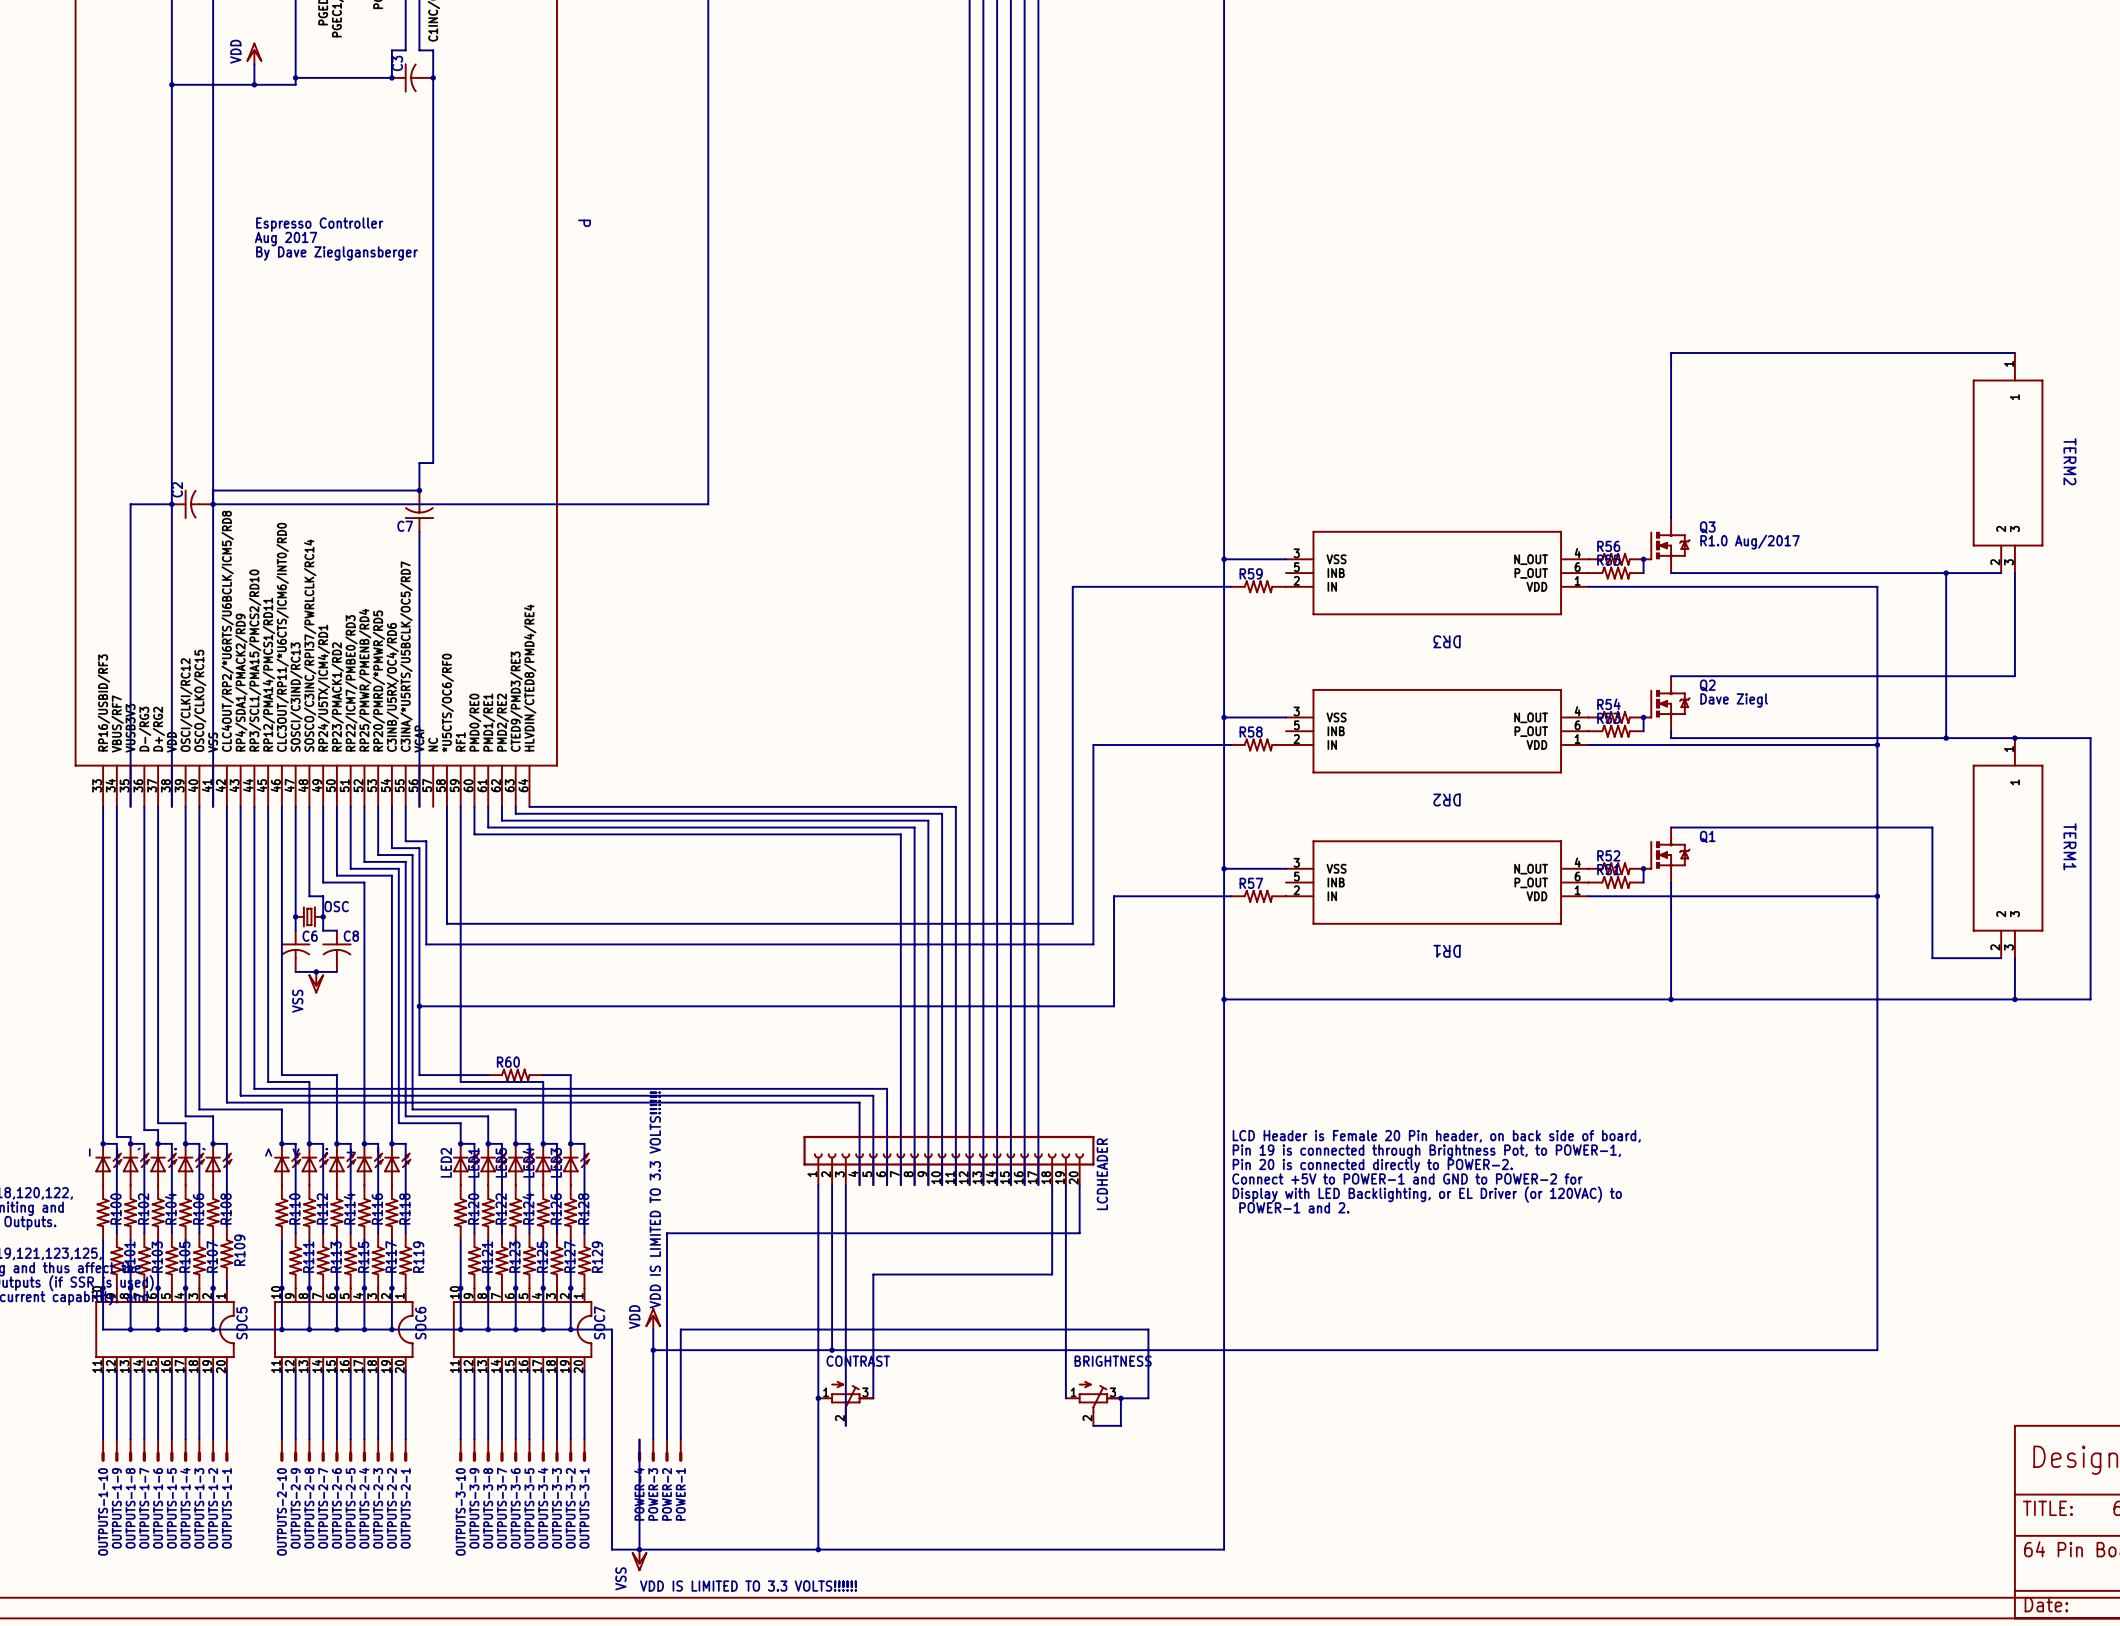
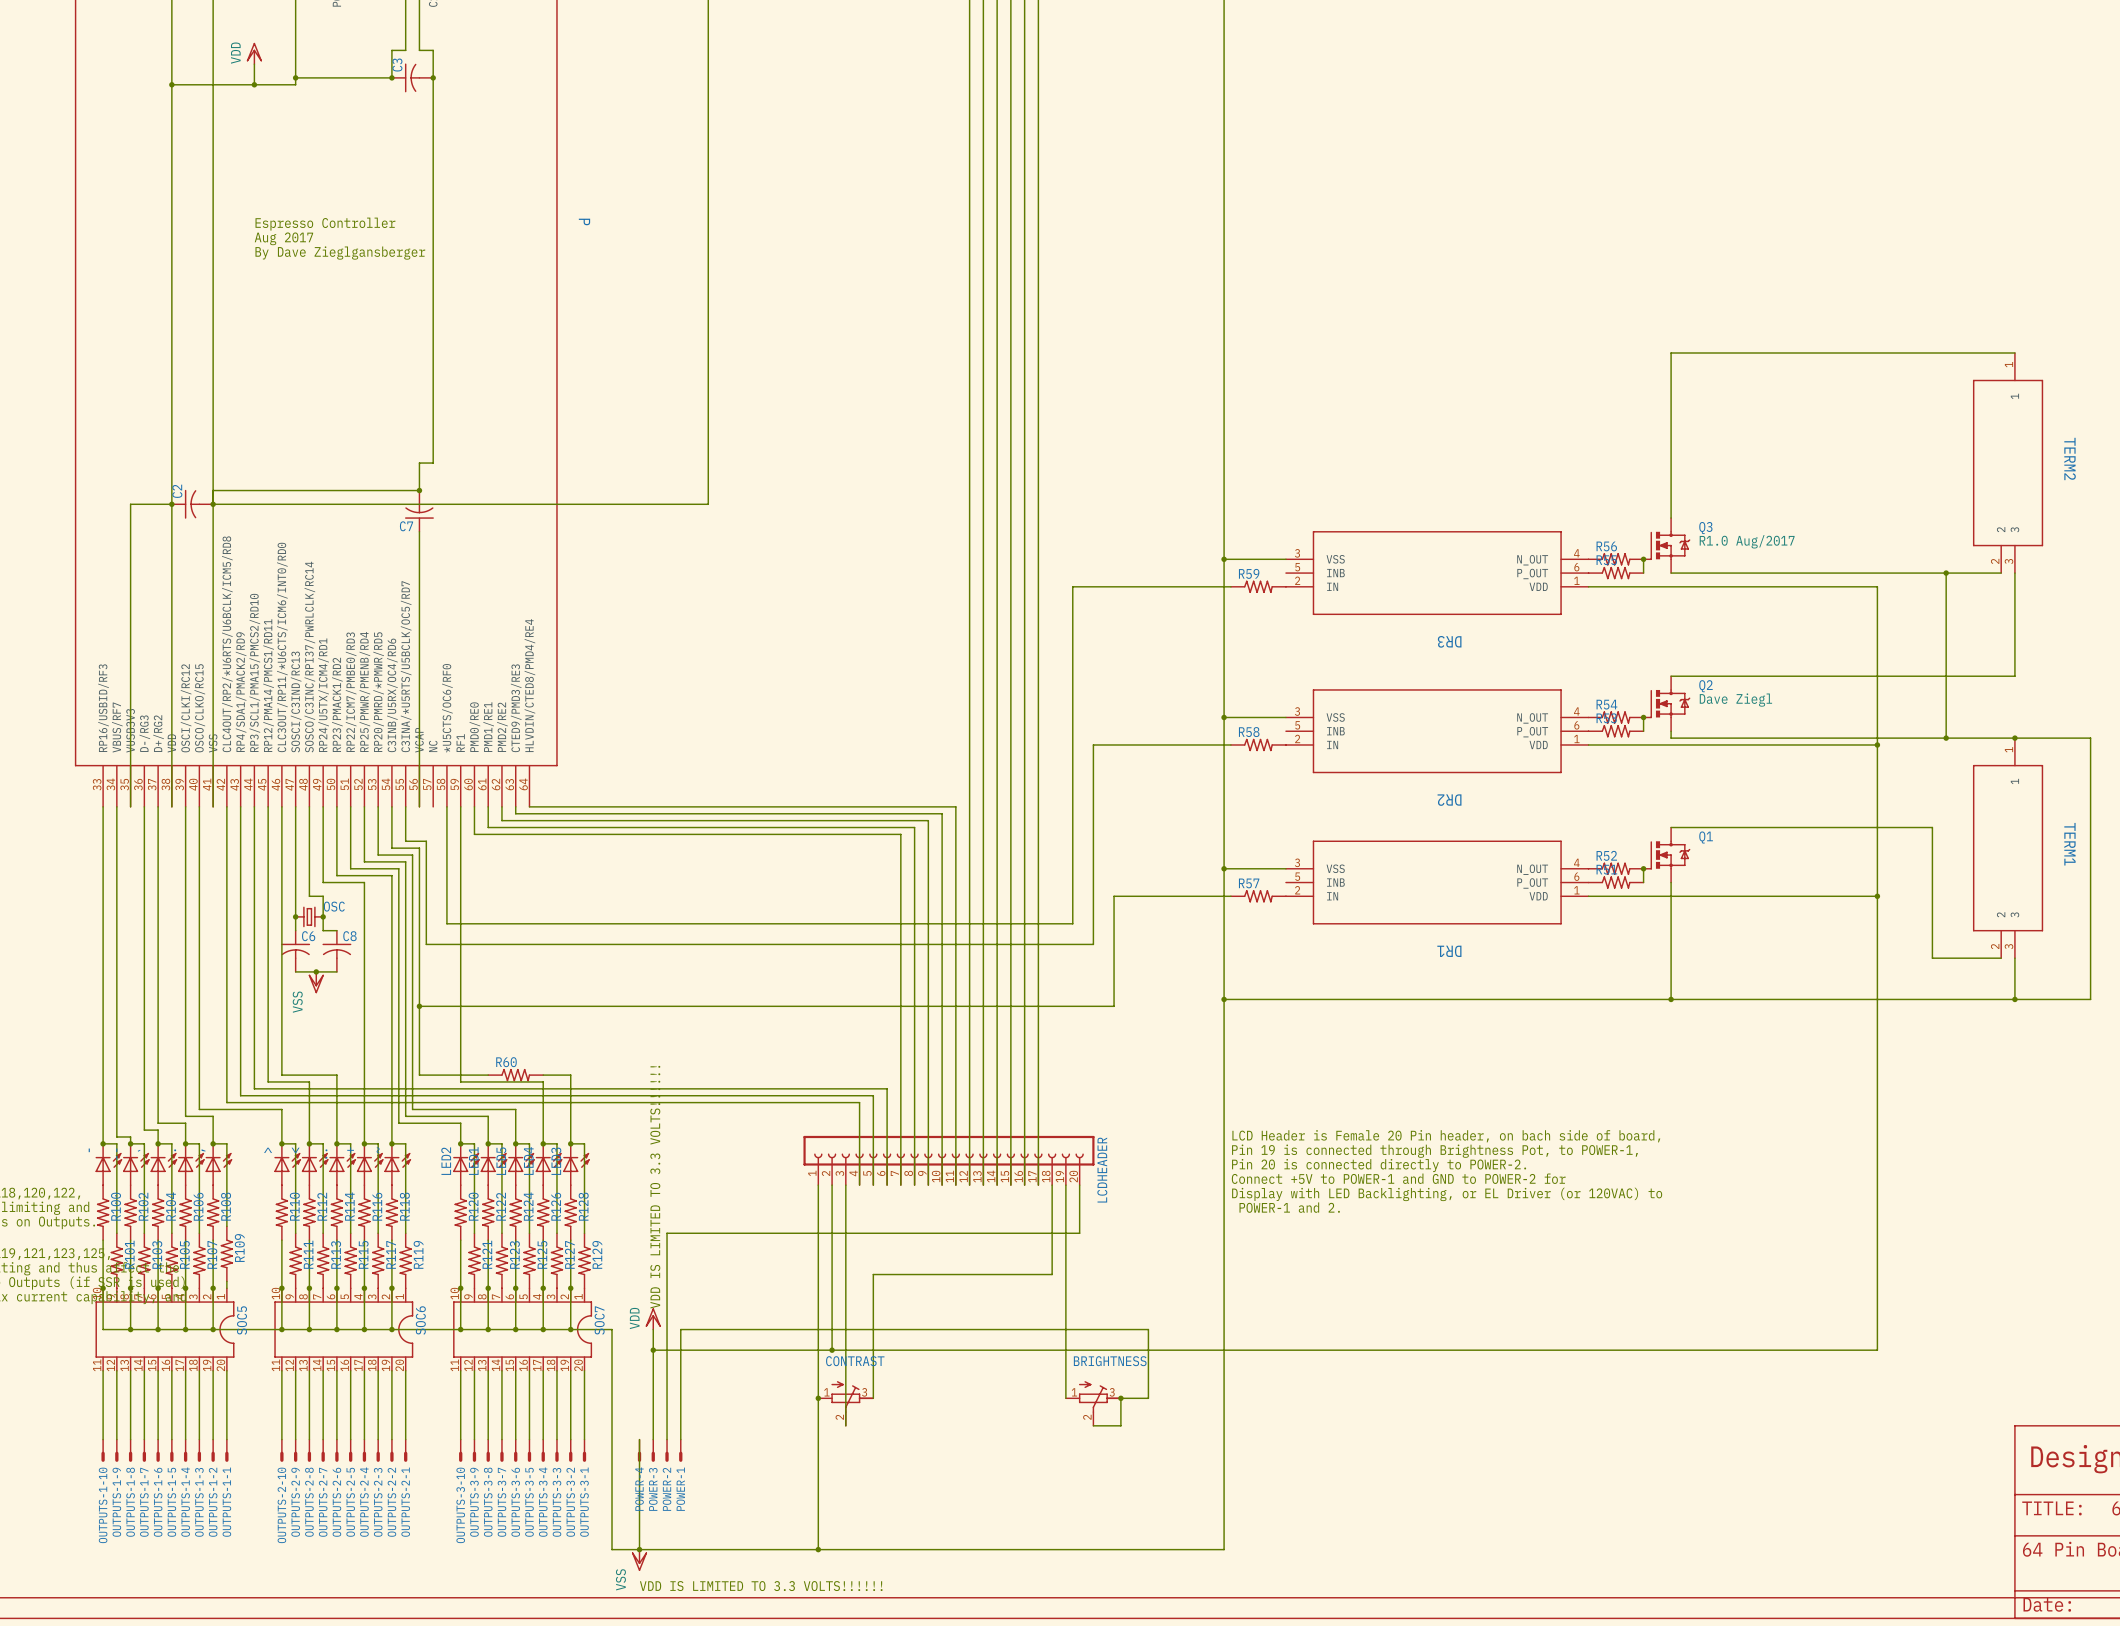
text: LCD Header is Female 20 Pin header, on back side of board, (1436, 1136) -> LCD Header is Female 20 Pin header, on bach side of board, (1446, 1136)

